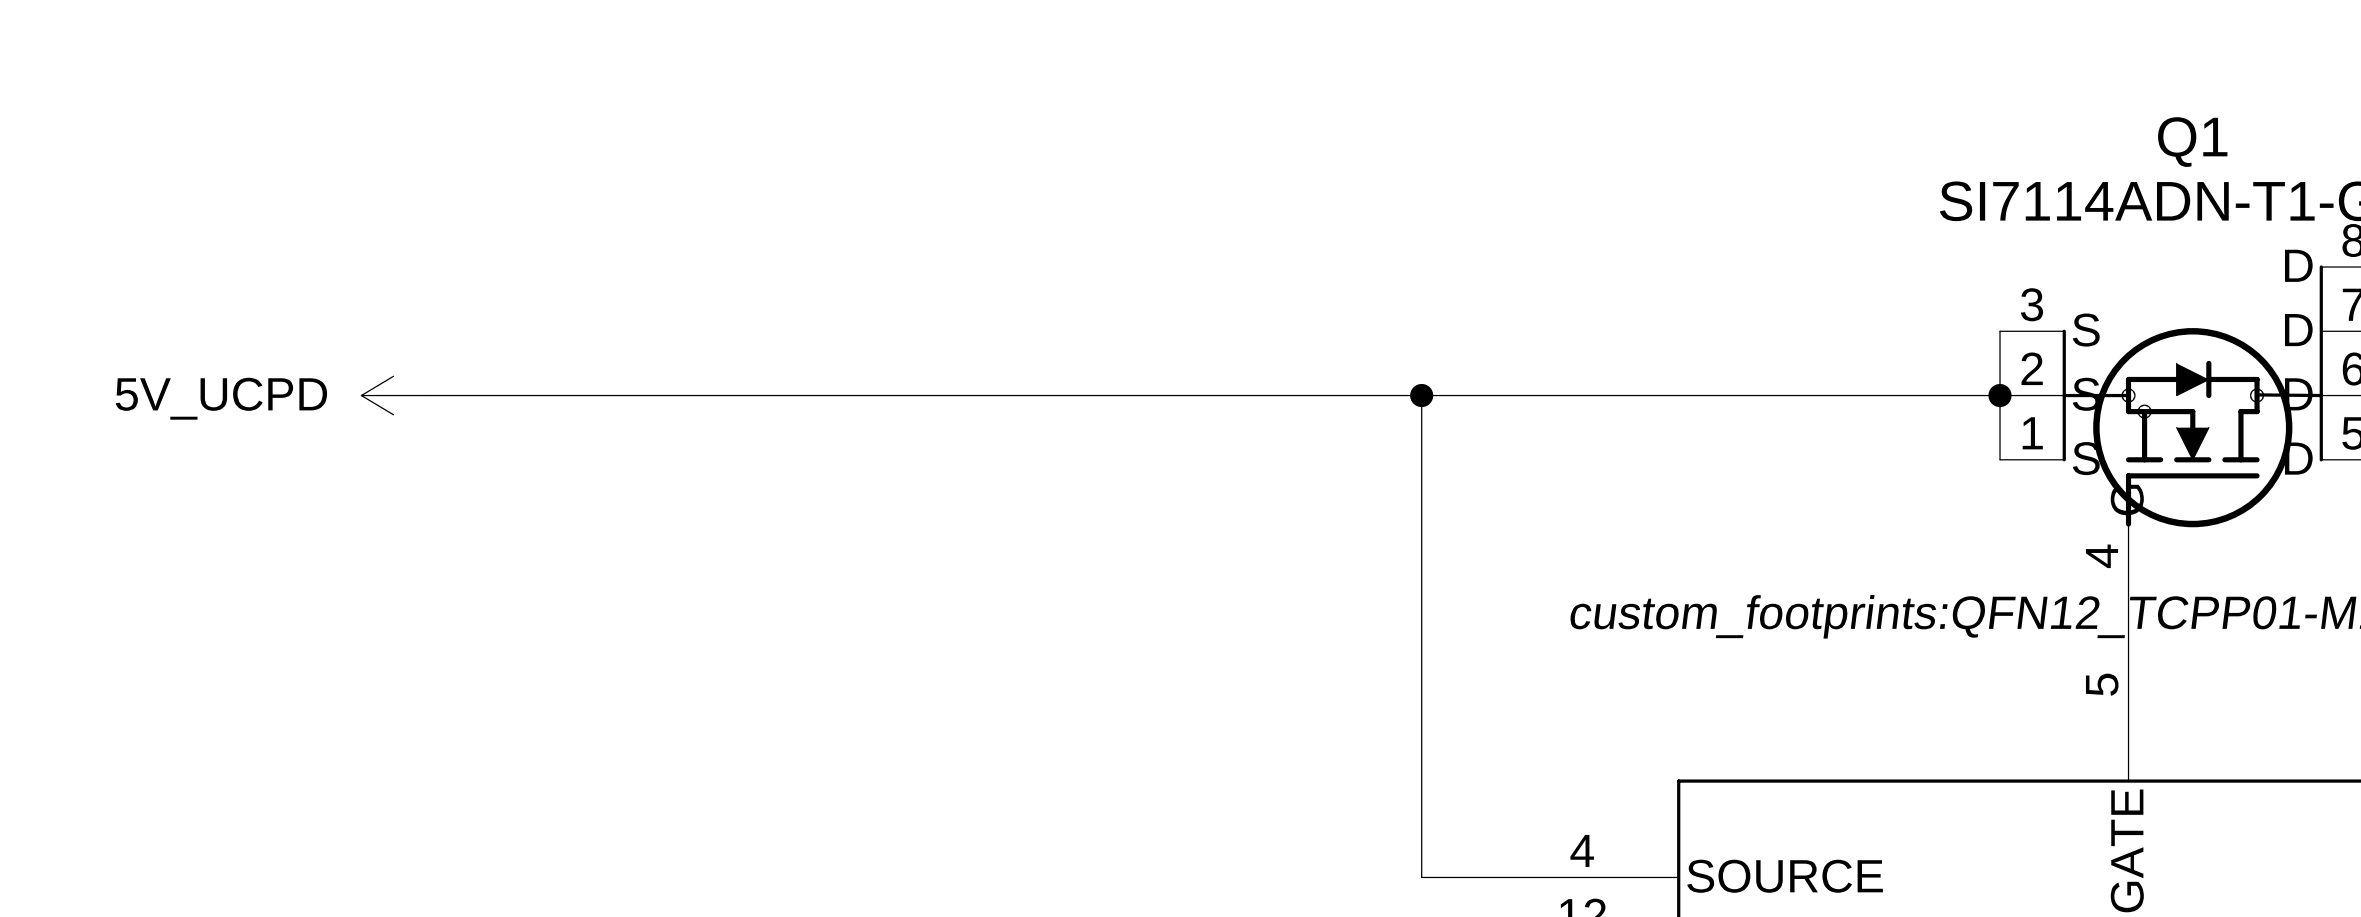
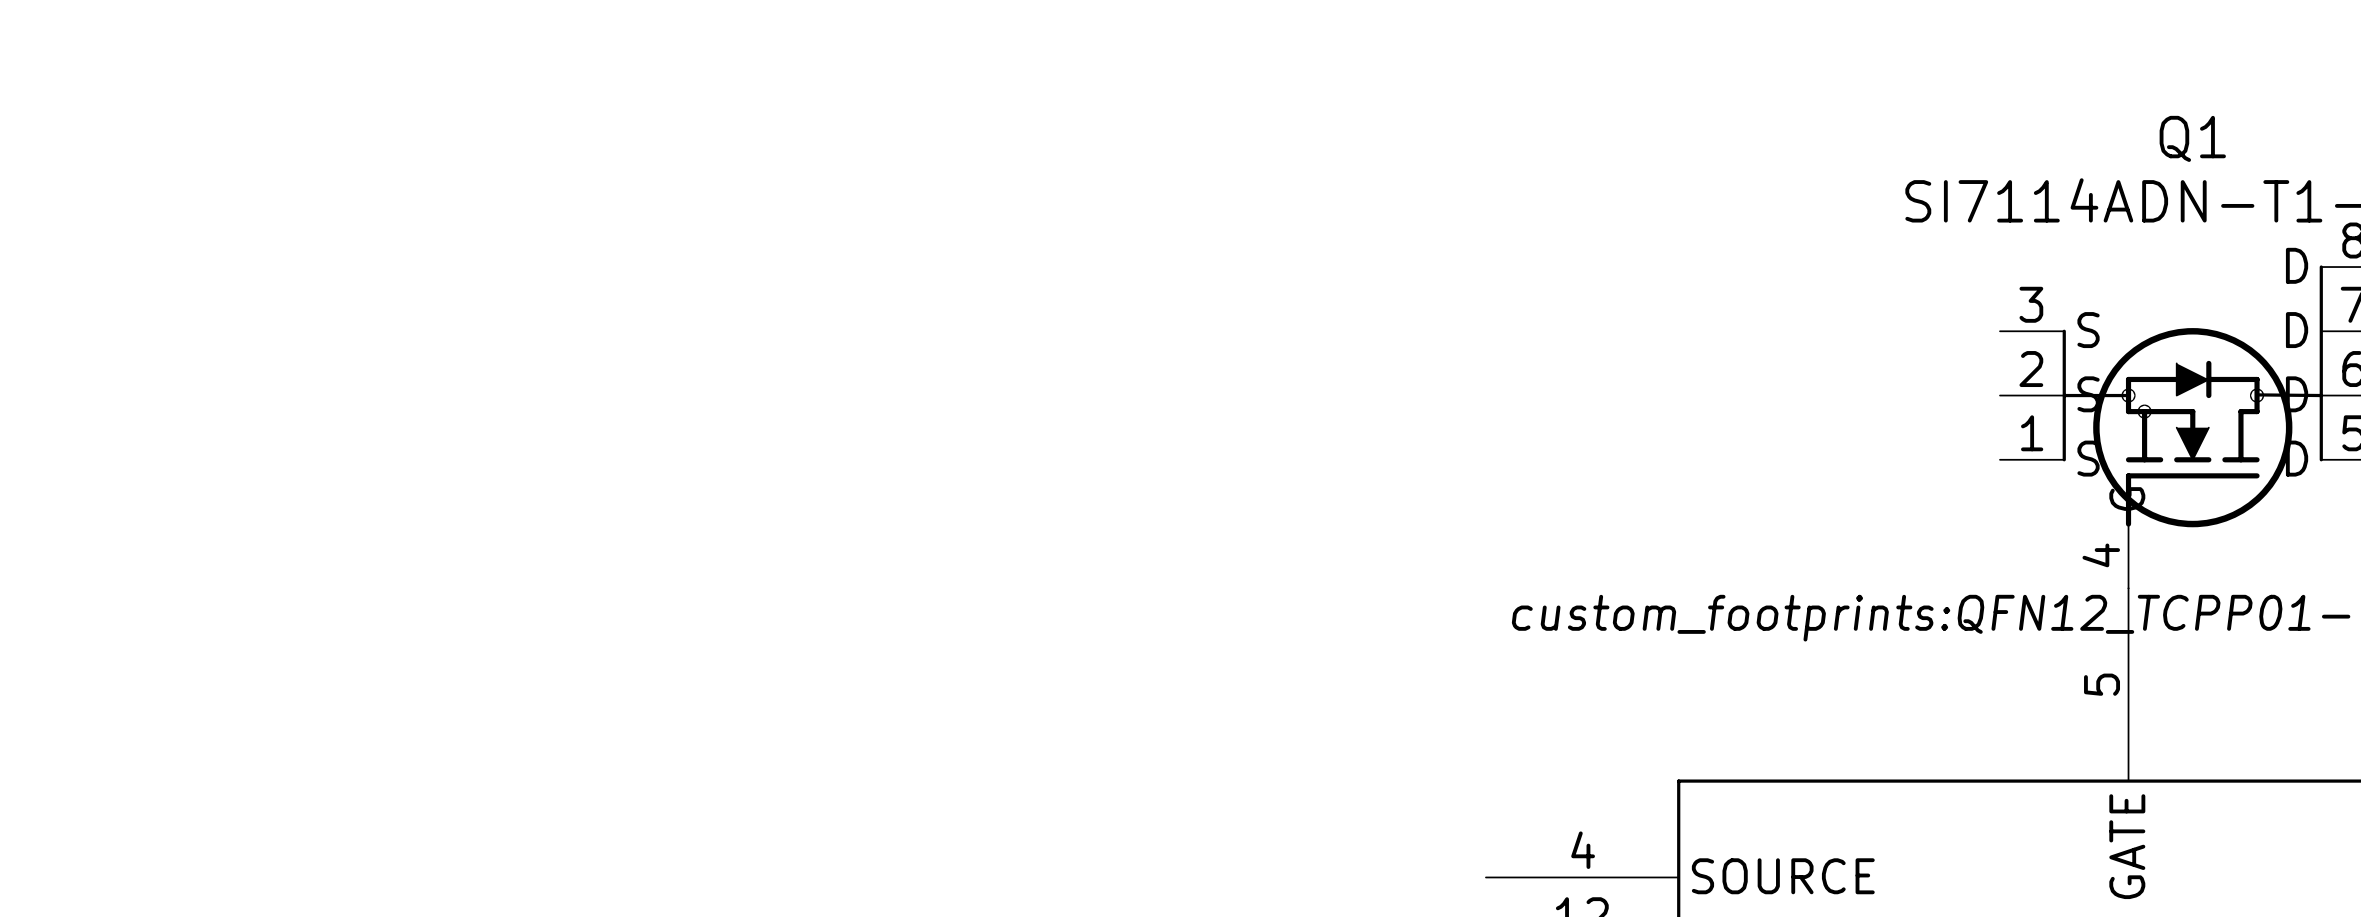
wire: (2000, 331) (2000, 459) -> none
power symbol: 5V_UCPD (393, 395) -> none
wire: (425, 395) (2000, 395) -> none
wire: (1421, 395) (1421, 877) (1485, 877) -> none
junction: (1421, 395) -> none
junction: (2000, 395) -> none

